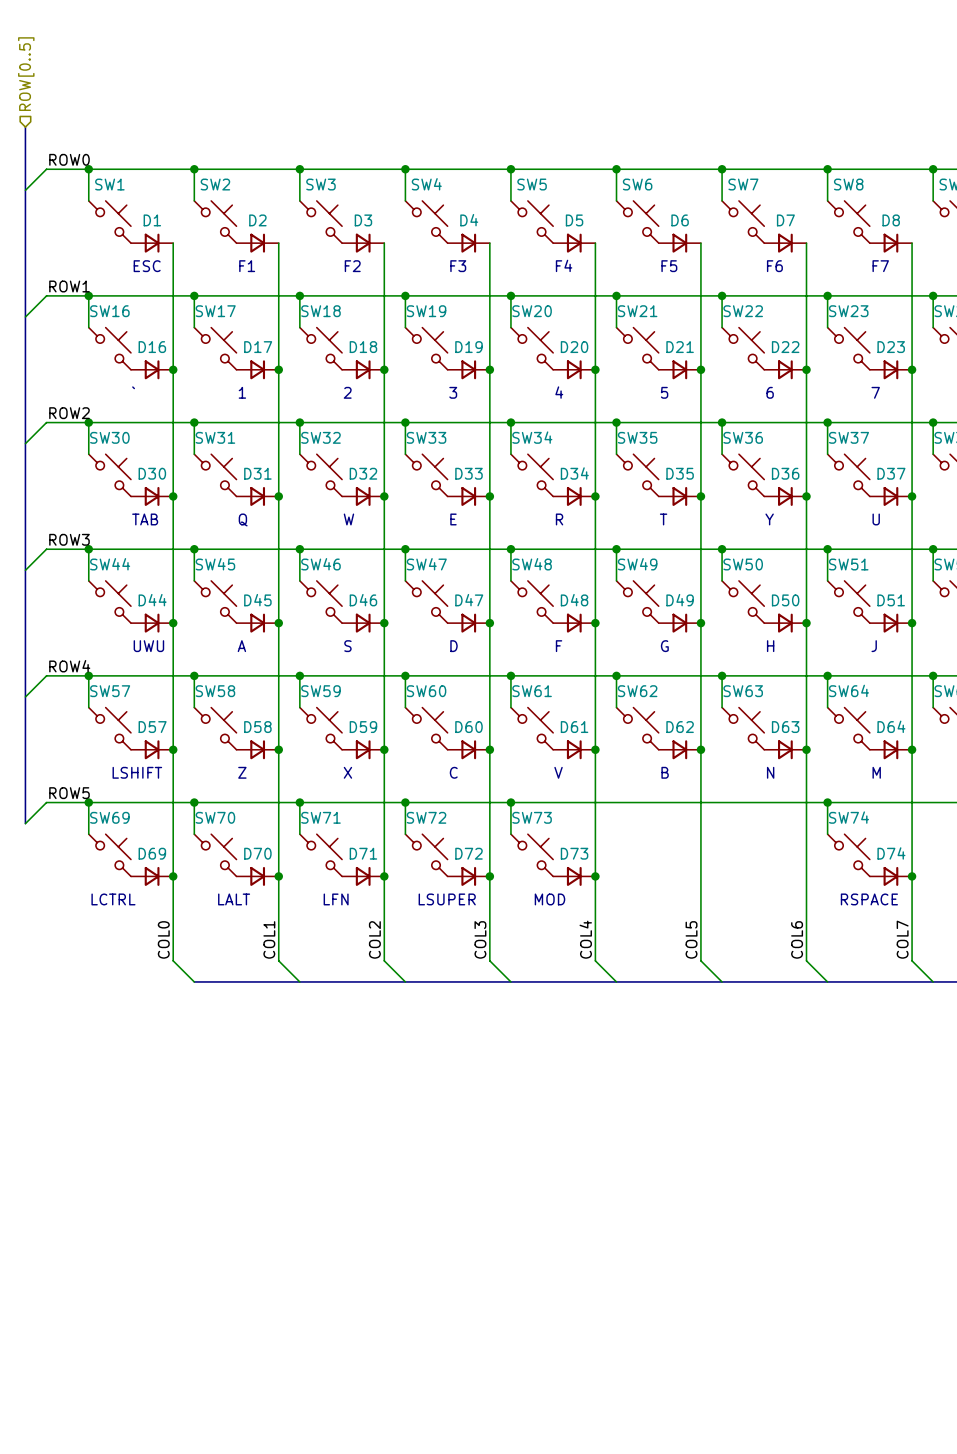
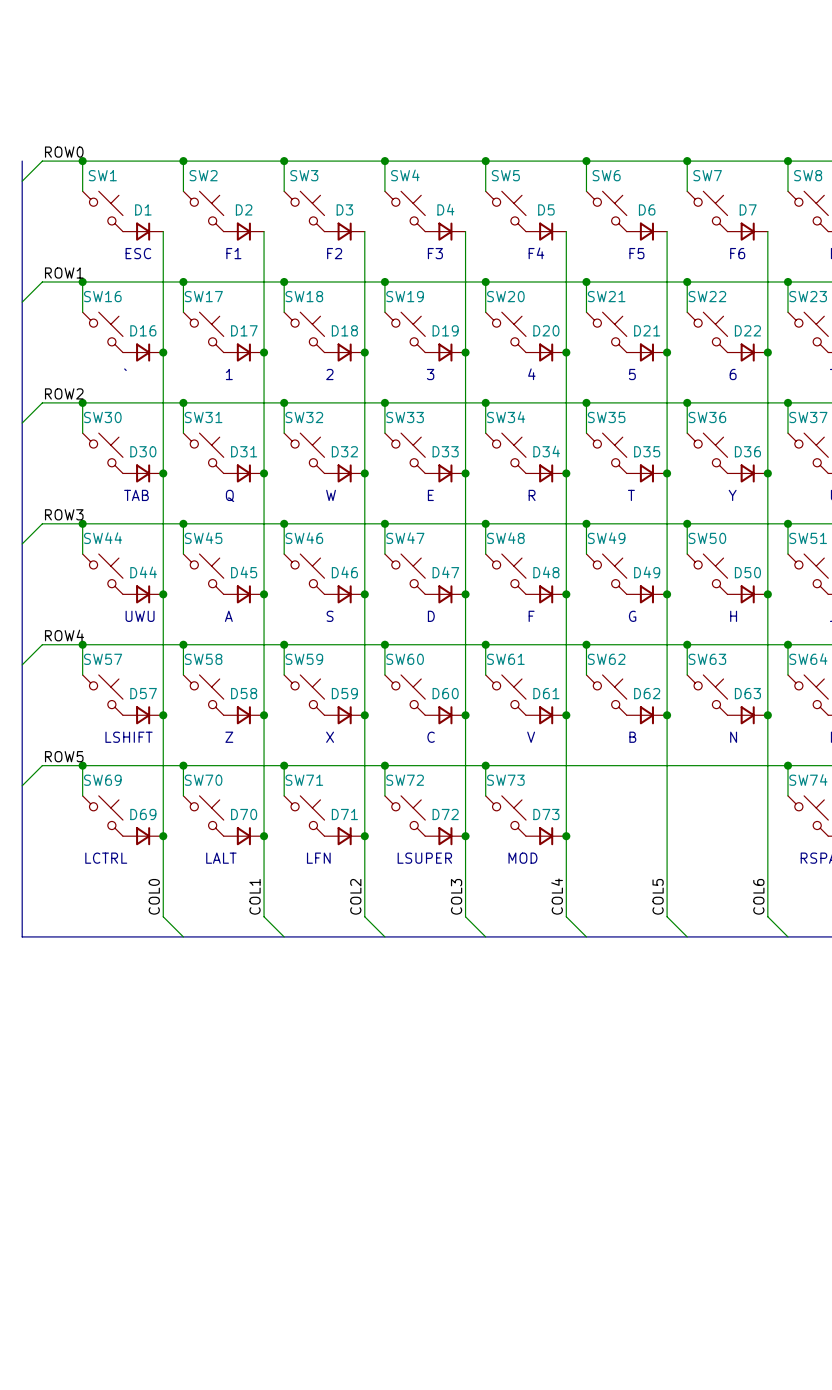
hierarchical label: ROW[0..5] (26, 74) -> none
bus: (25, 127) (25, 169) -> none
bus: none -> (22, 785) (22, 936) (183, 936)

